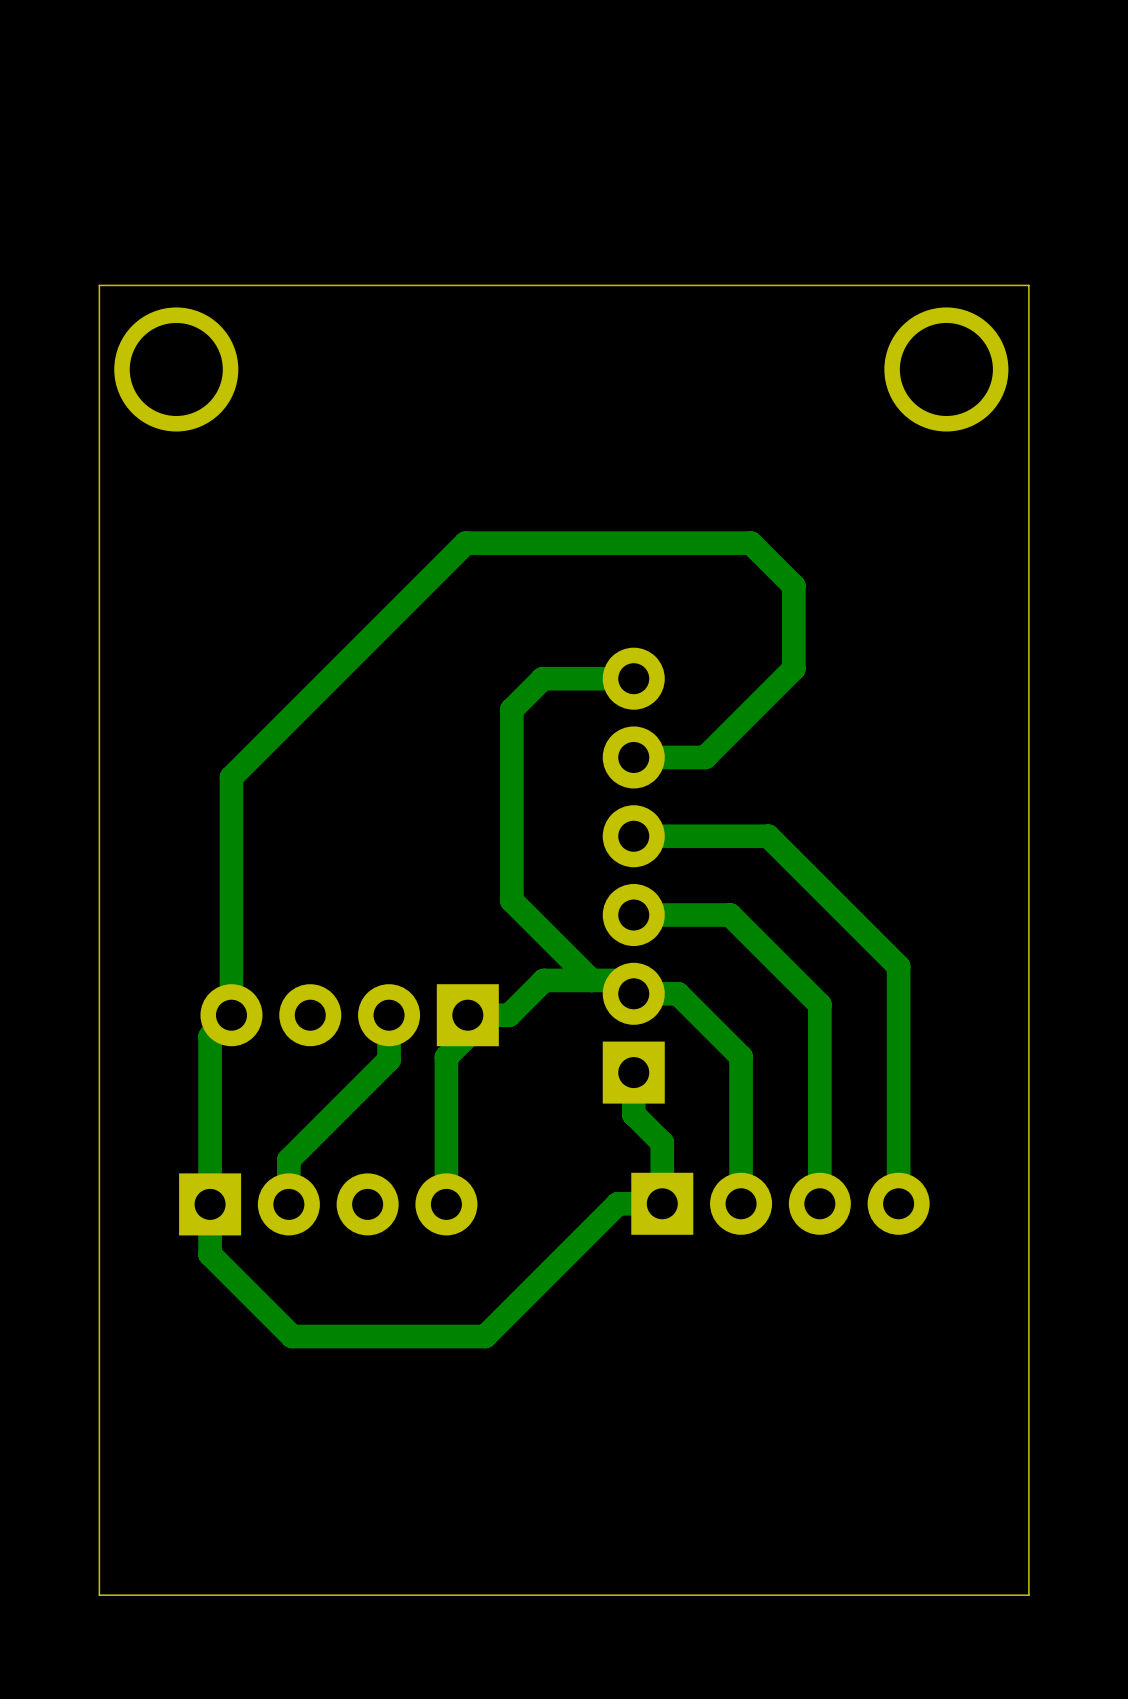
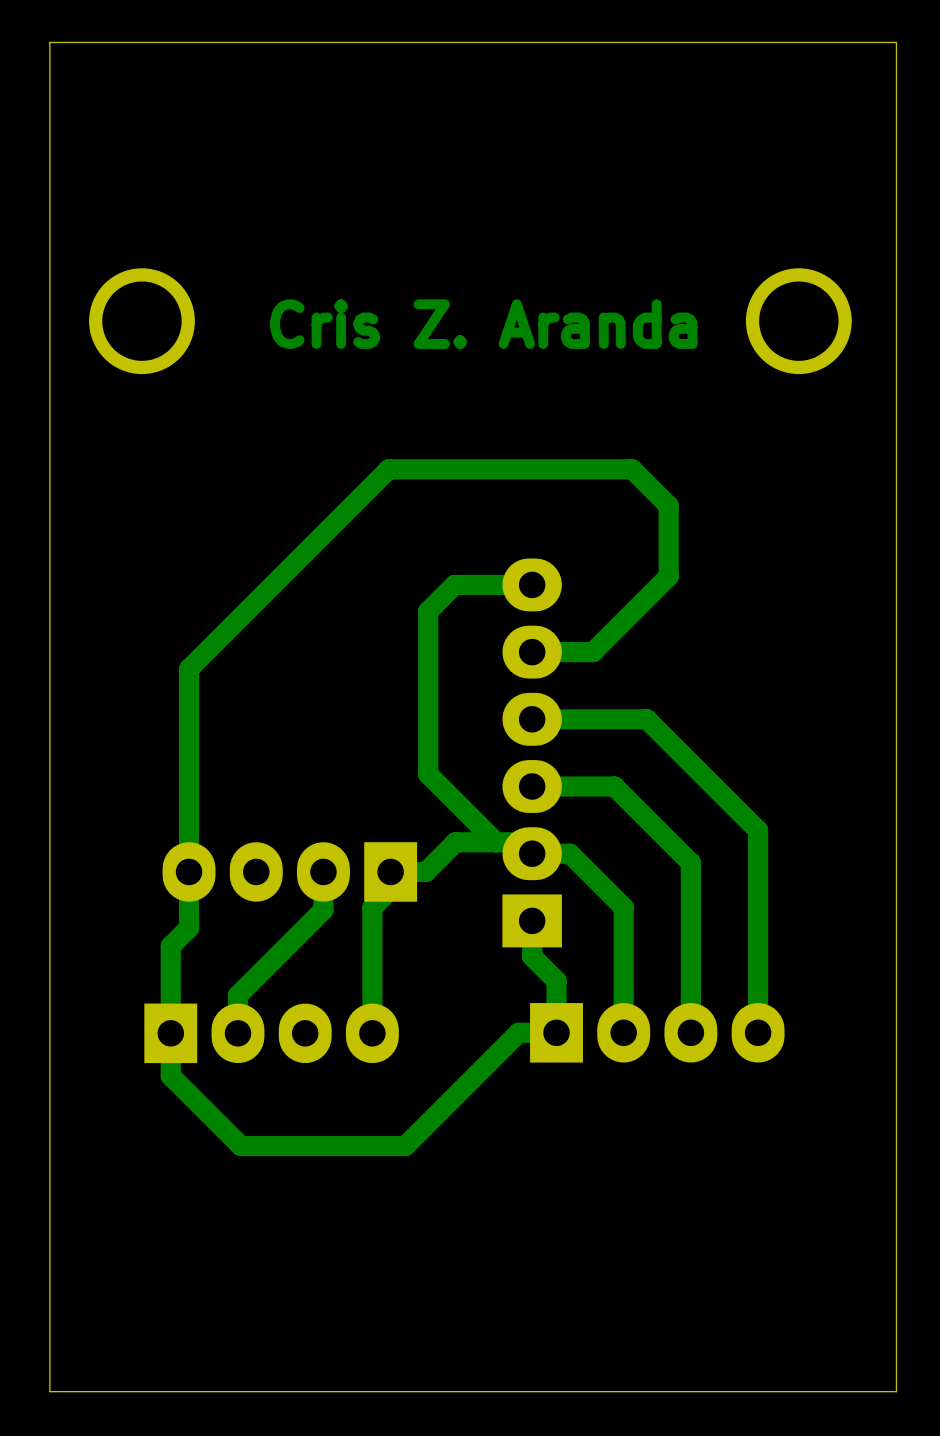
board edge: (1028, 285) (99, 285) (99, 1595) (1028, 1595) (1028, 285) -> (896, 42) (896, 1391) (49, 1391) (49, 42) (896, 42)
text: none -> Cris Z. Aranda (483, 324)
part footprint: [602, 647, 665, 1104] -> [502, 558, 562, 948]
part footprint: [200, 984, 499, 1047] -> [162, 842, 418, 902]
bottom track: (231, 1015) (210, 1036) (210, 1102) -> (189, 871) (189, 927) (170, 946)
part footprint: [631, 1172, 930, 1235] -> [530, 1003, 785, 1063]
part footprint: [179, 1173, 478, 1236] -> [144, 1003, 399, 1064]

